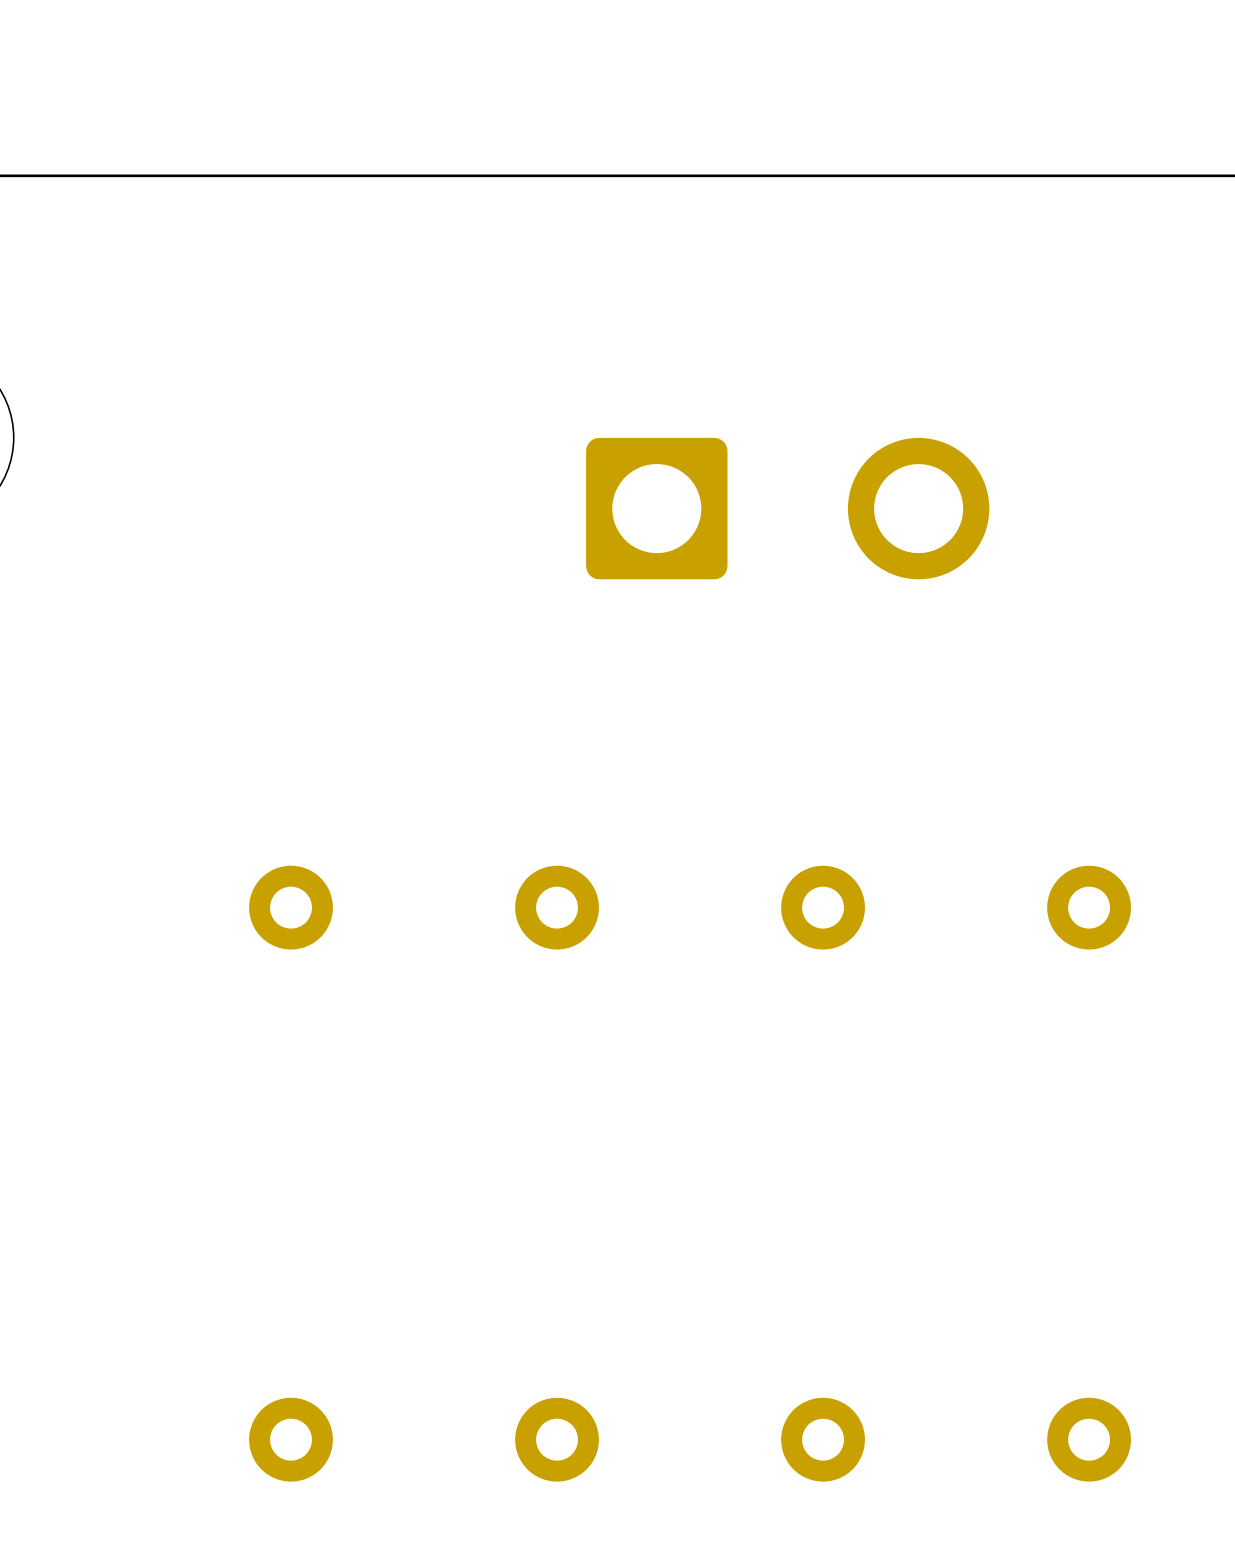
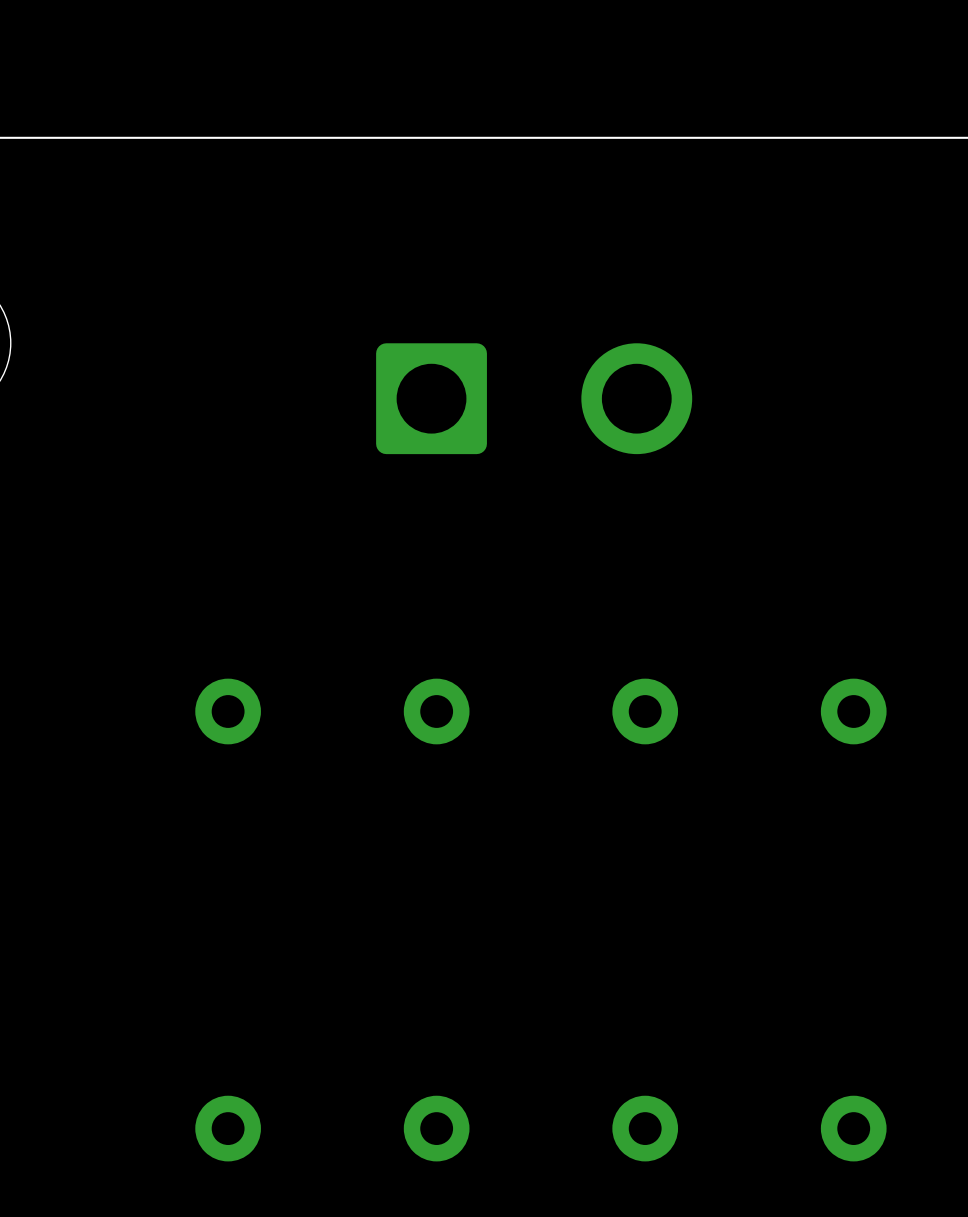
part position: (787, 508) -> (534, 398)

